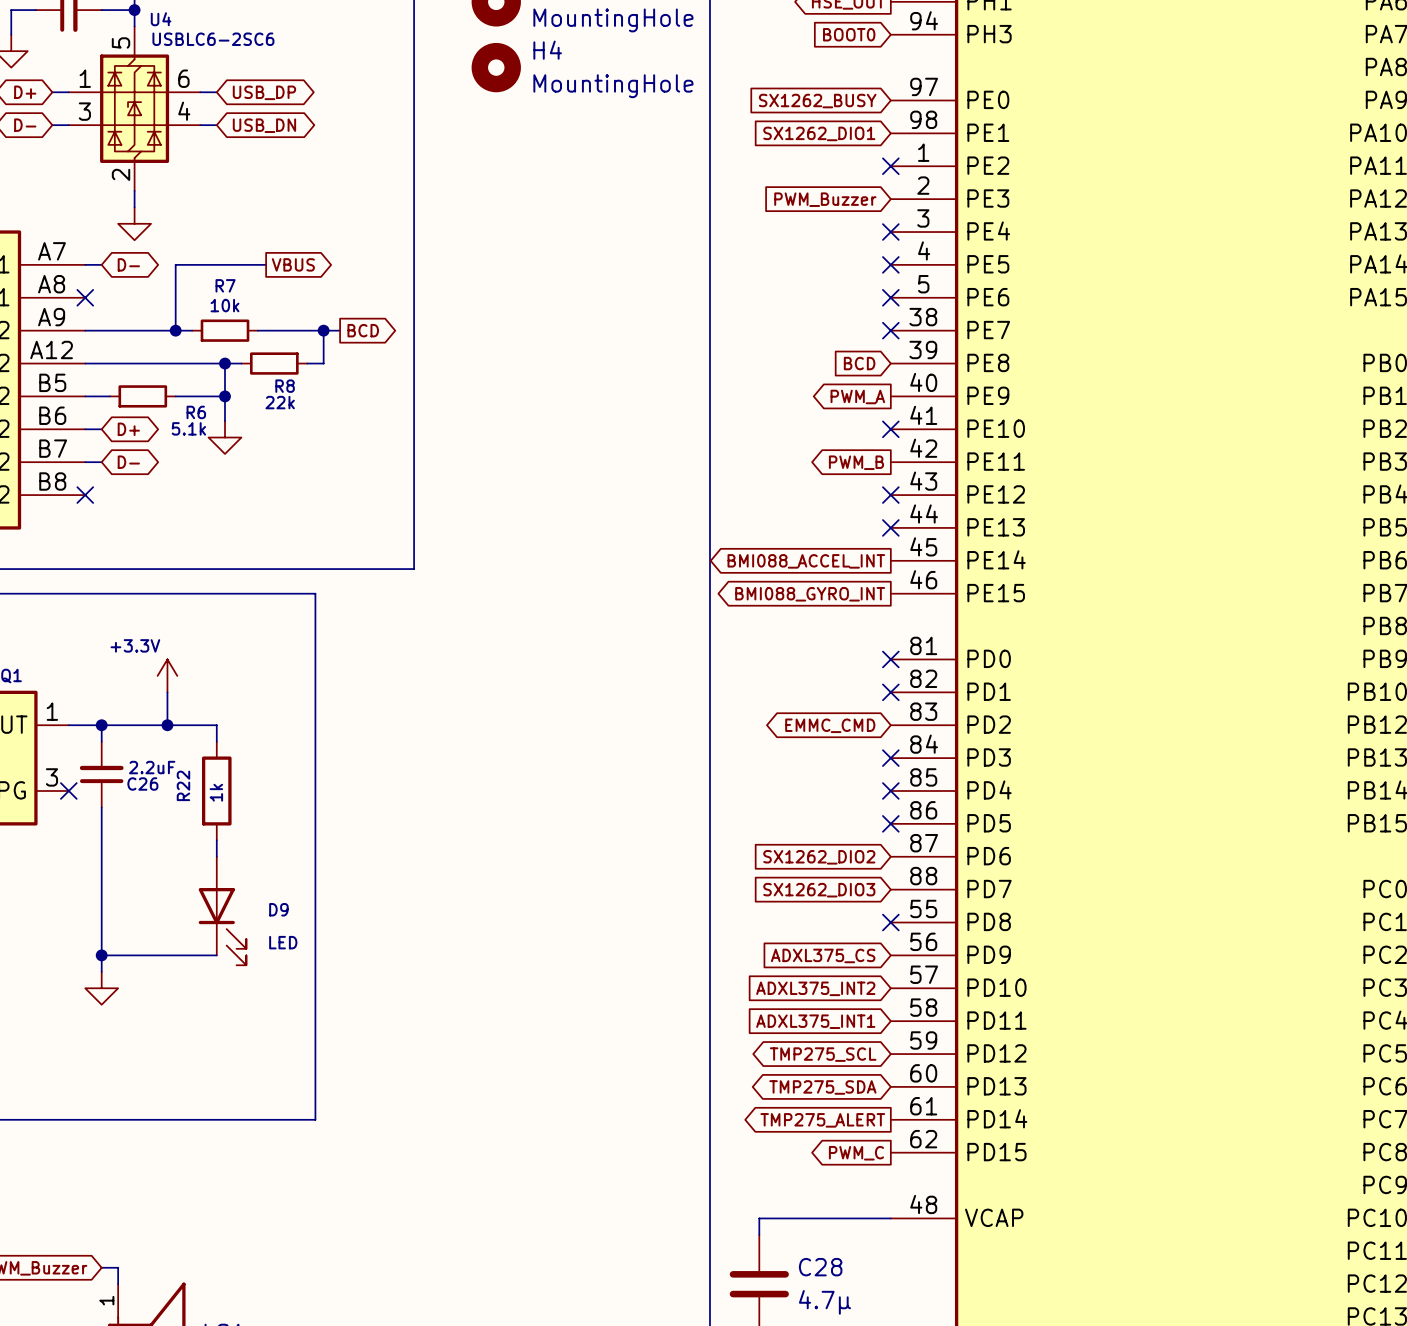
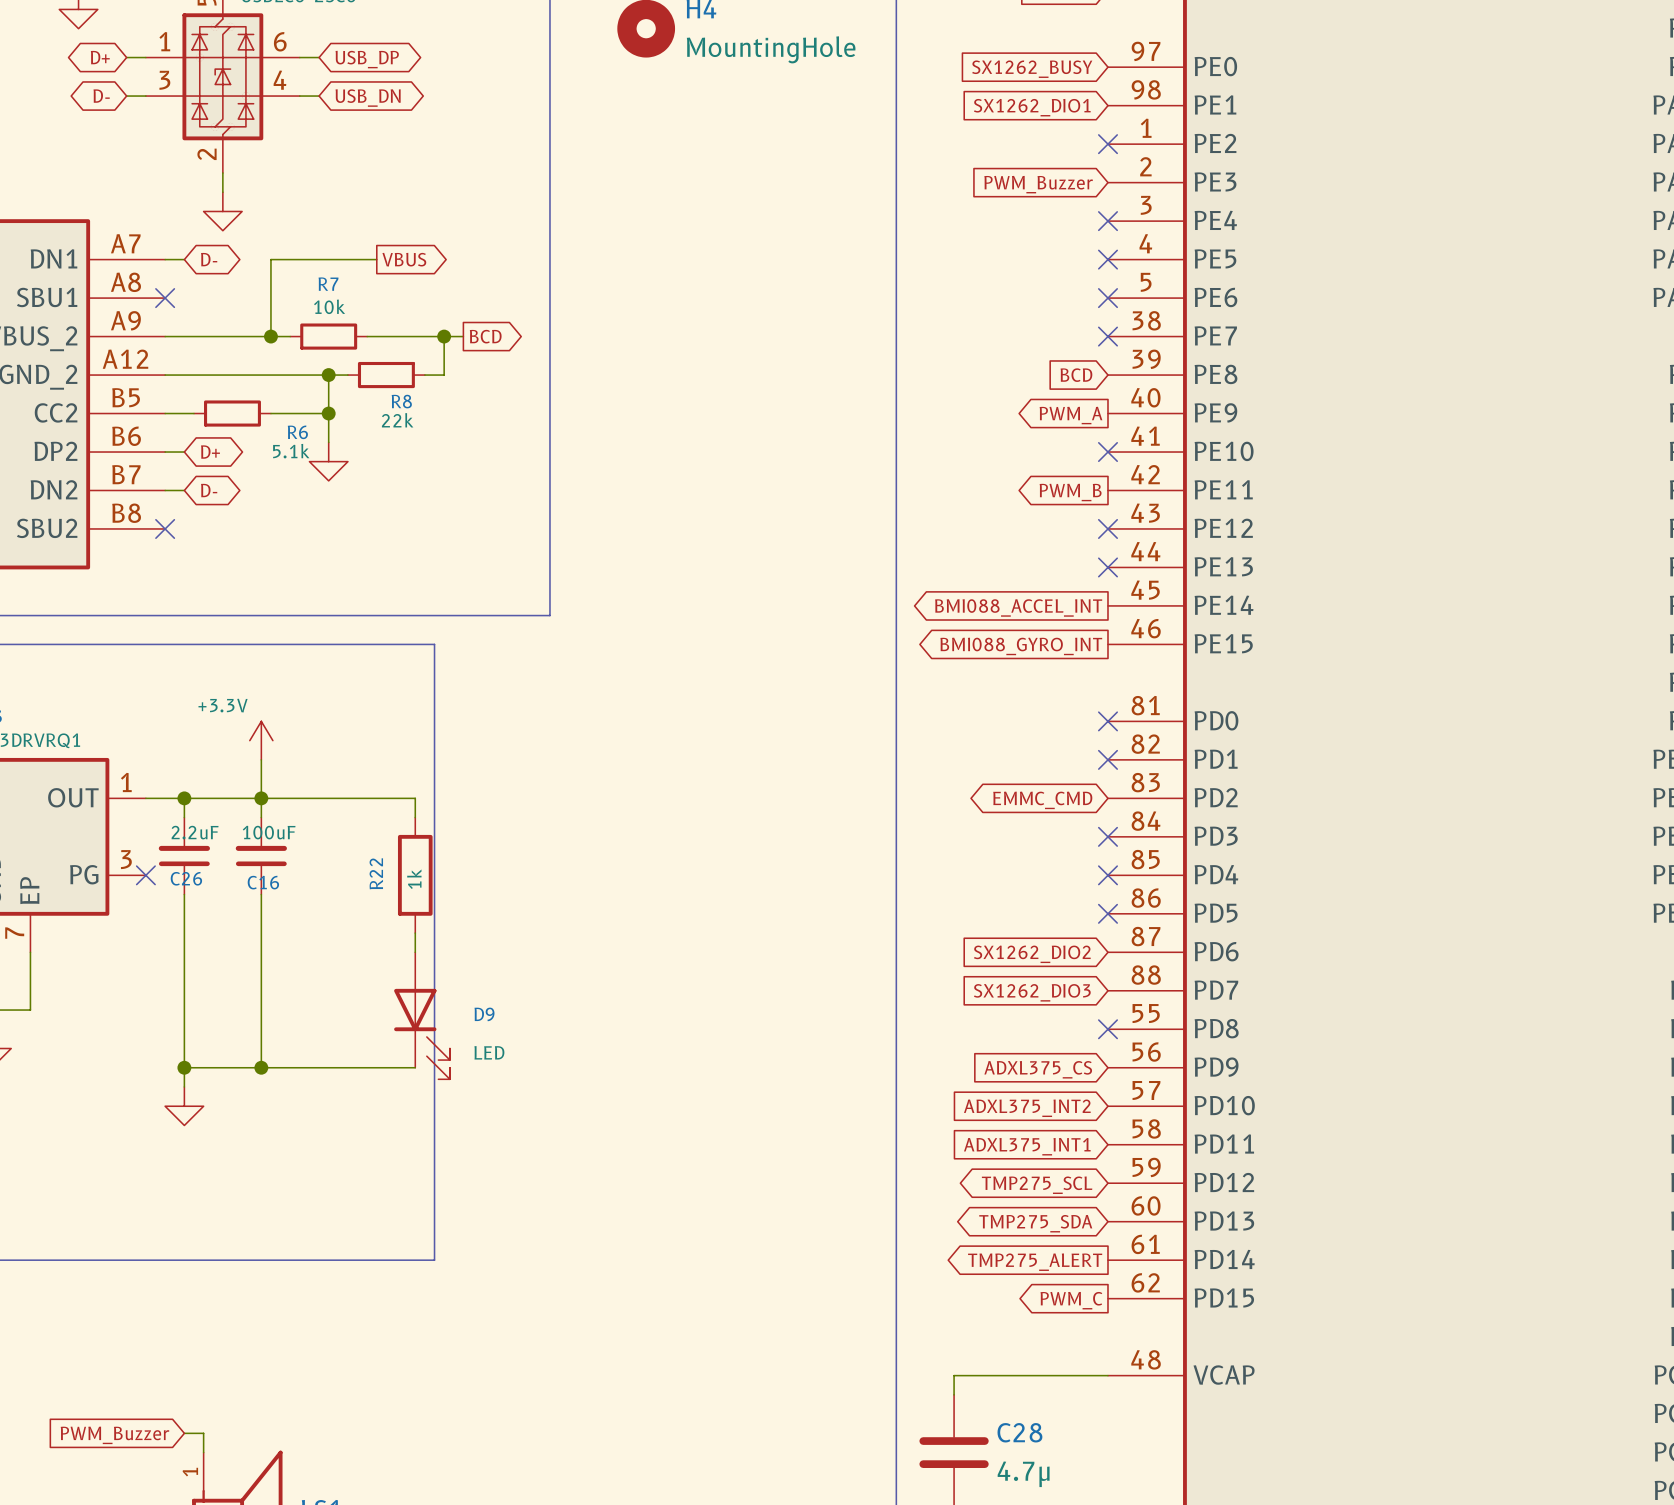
wire: none -> (261, 798) (261, 817)
wire: (216, 725) (216, 741) -> (319, 798) (415, 798) (415, 817)
C26 value position: 2.2uF (152, 767) -> 2.2uF (195, 832)
C16: none -> 100uF (261, 856)
C26 name position: C26 (142, 783) -> C26 (186, 878)
R22 position: (216, 790) -> (415, 875)
wire: none -> (261, 894) (261, 1067)
wire: (216, 840) (216, 856) -> (415, 933) (415, 952)
D9 position: (222, 911) -> (422, 1015)
junction: none -> (261, 1067)
wire: none -> (319, 1067) (415, 1067)

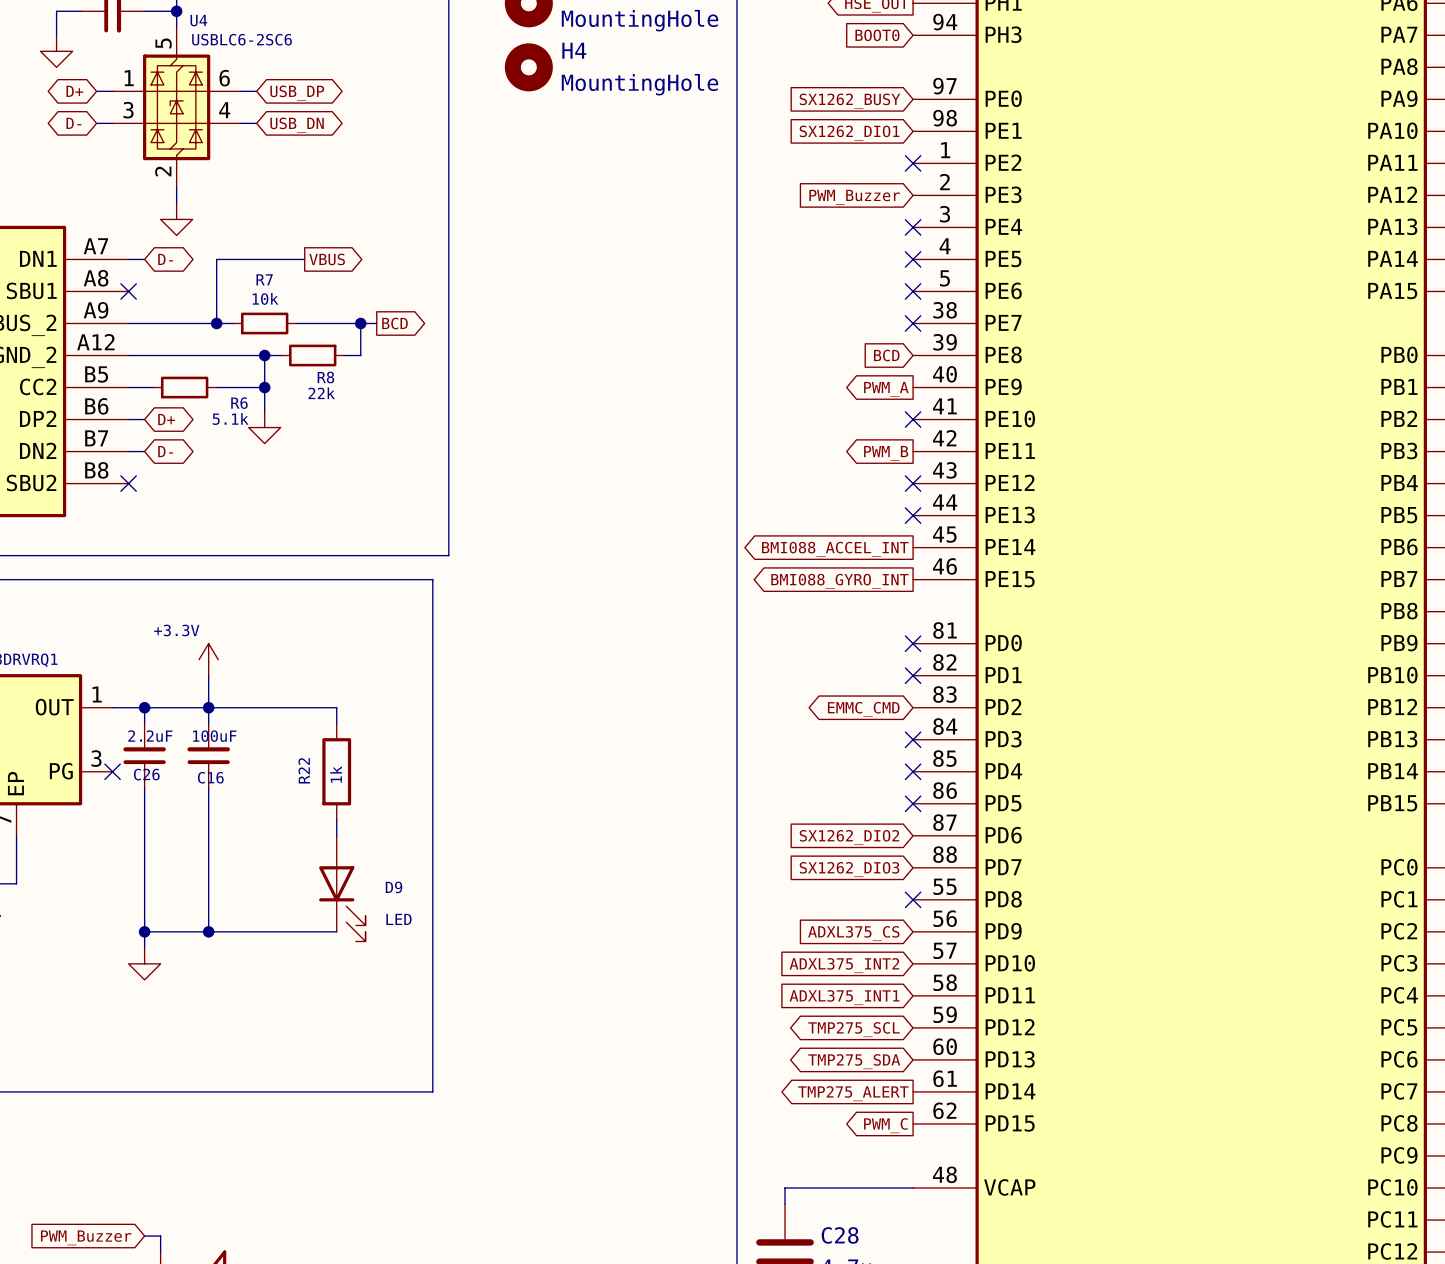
line: (434, 644) (434, 1260) -> (352, 579) (432, 579) (432, 1091) (352, 1091)

